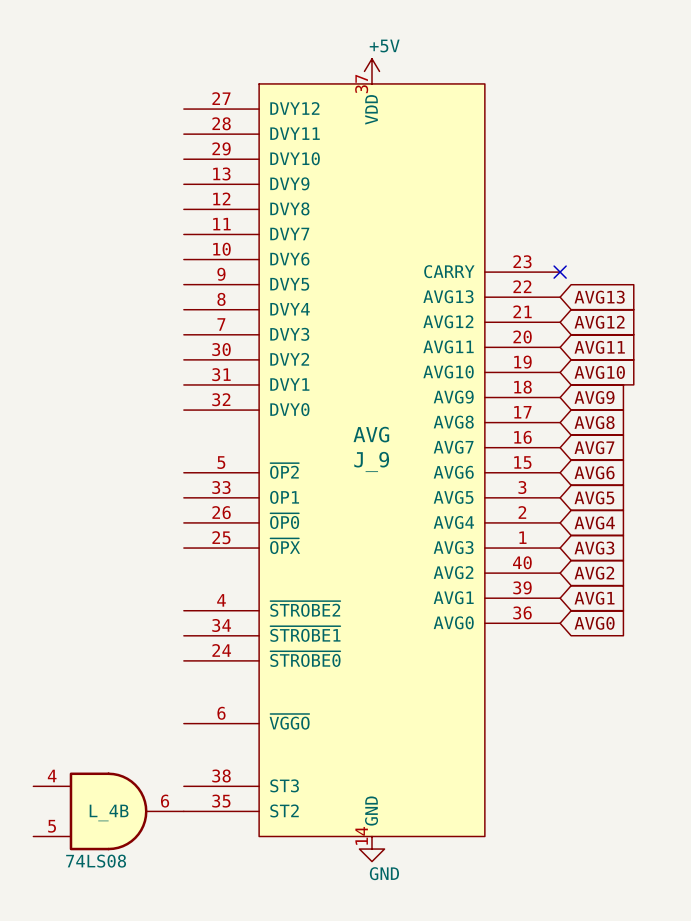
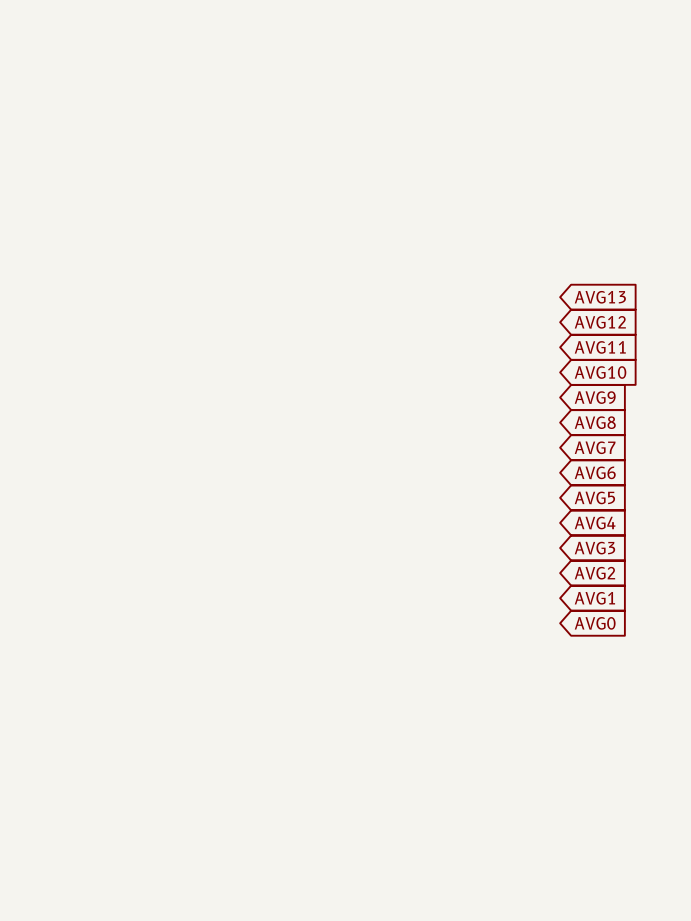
power symbol: +5V (371, 71) -> none
no-connect mark: (560, 272) -> none
J_9: AVG (371, 460) -> none
L_4B: 74LS08 (108, 811) -> none
power symbol: GND (371, 849) -> none

